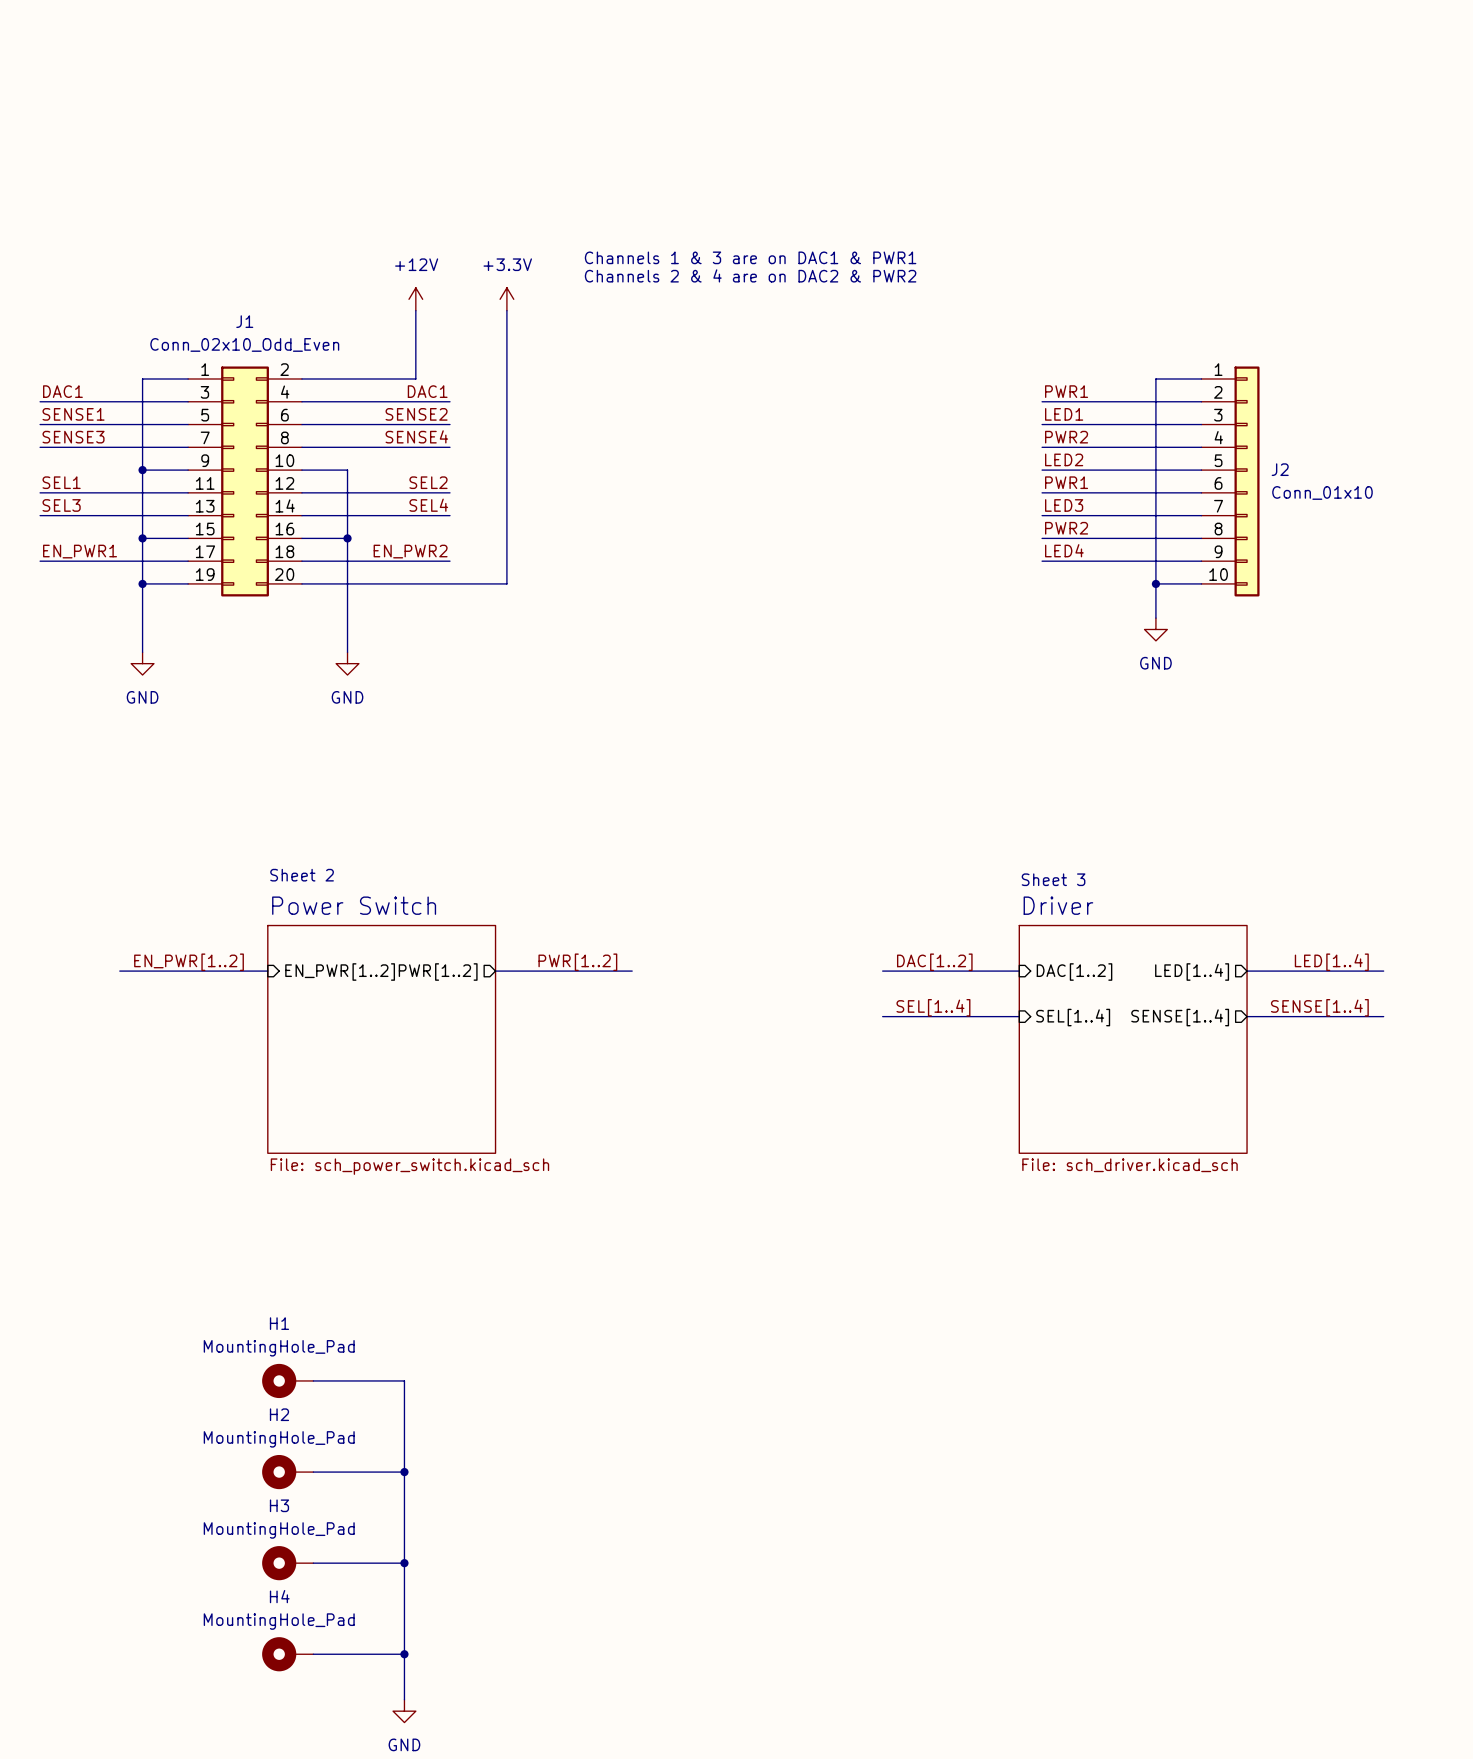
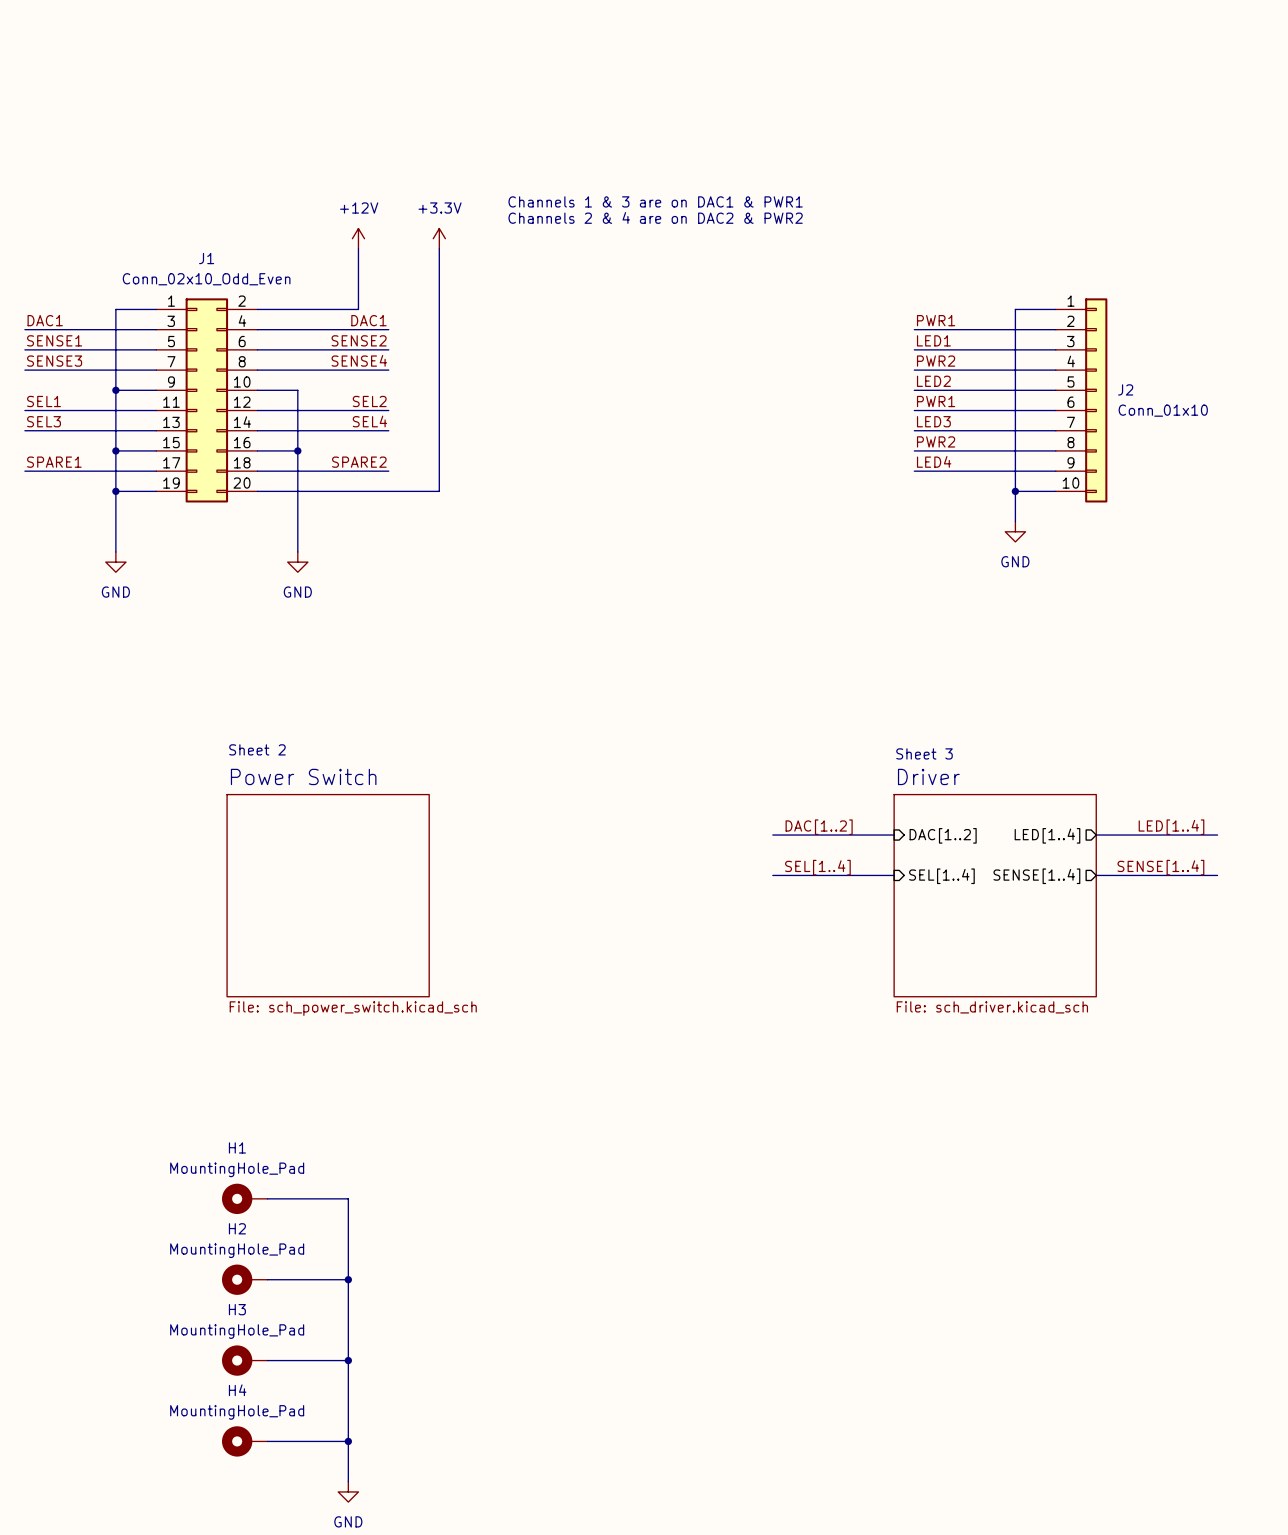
label: EN_PWR1 (80, 551) -> SPARE1 (54, 462)
label: EN_PWR2 (410, 551) -> SPARE2 (359, 462)
label: EN_PWR[1..2] (189, 962) -> none
label: PWR[1..2] (577, 962) -> none
bus: (119, 971) (267, 971) -> none
bus: (495, 971) (632, 971) -> none
sheet pin: EN_PWR[1..2] (340, 972) -> none
sheet pin: PWR[1..2] (438, 972) -> none

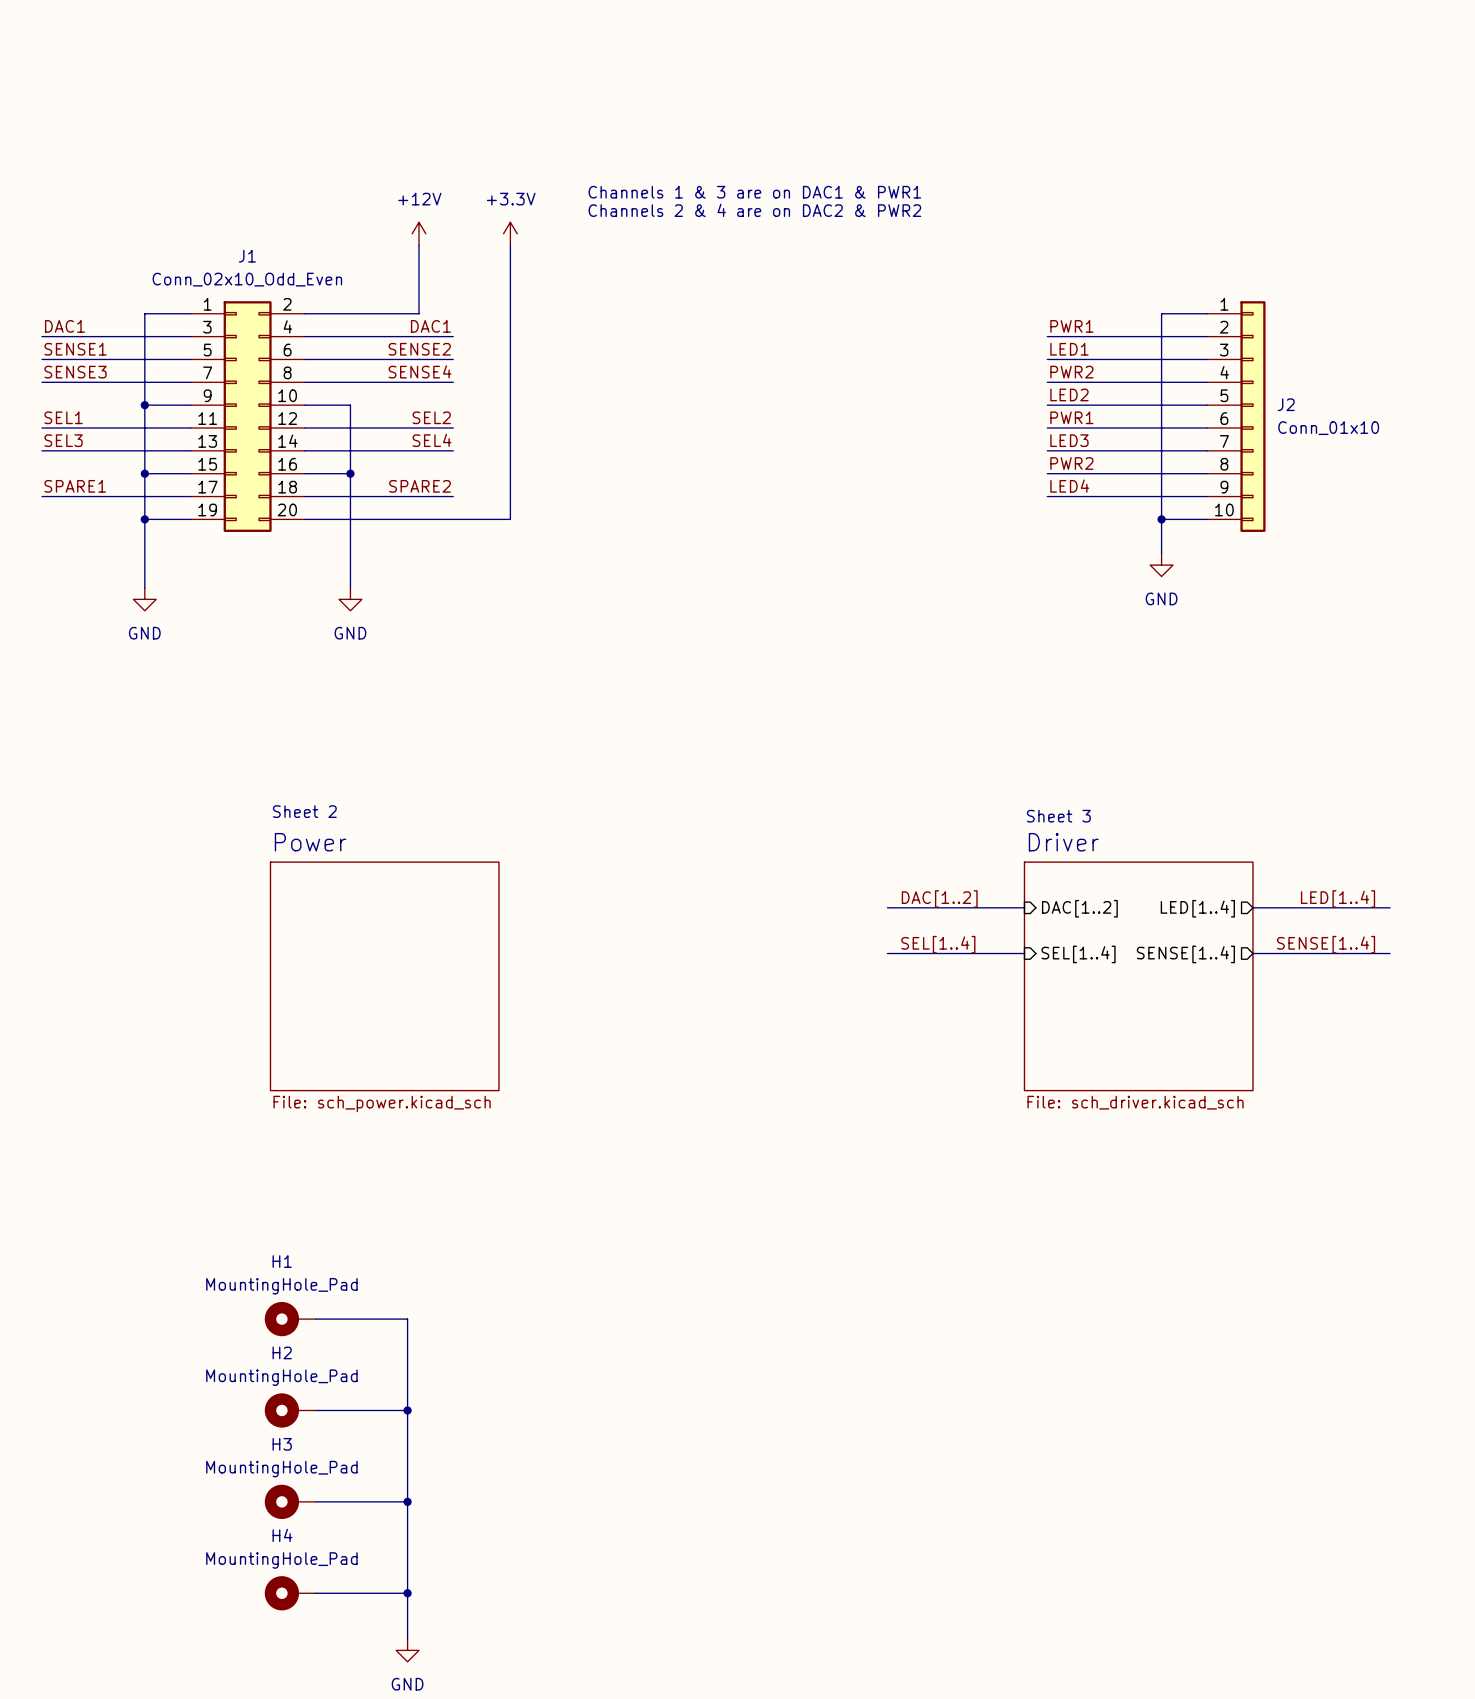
sheet Power Switch name: Power Switch (303, 776) -> Power (310, 842)
sheet Power Switch value: File: sch_power_switch.kicad_sch (353, 1008) -> File: sch_power.kicad_sch (382, 1104)

